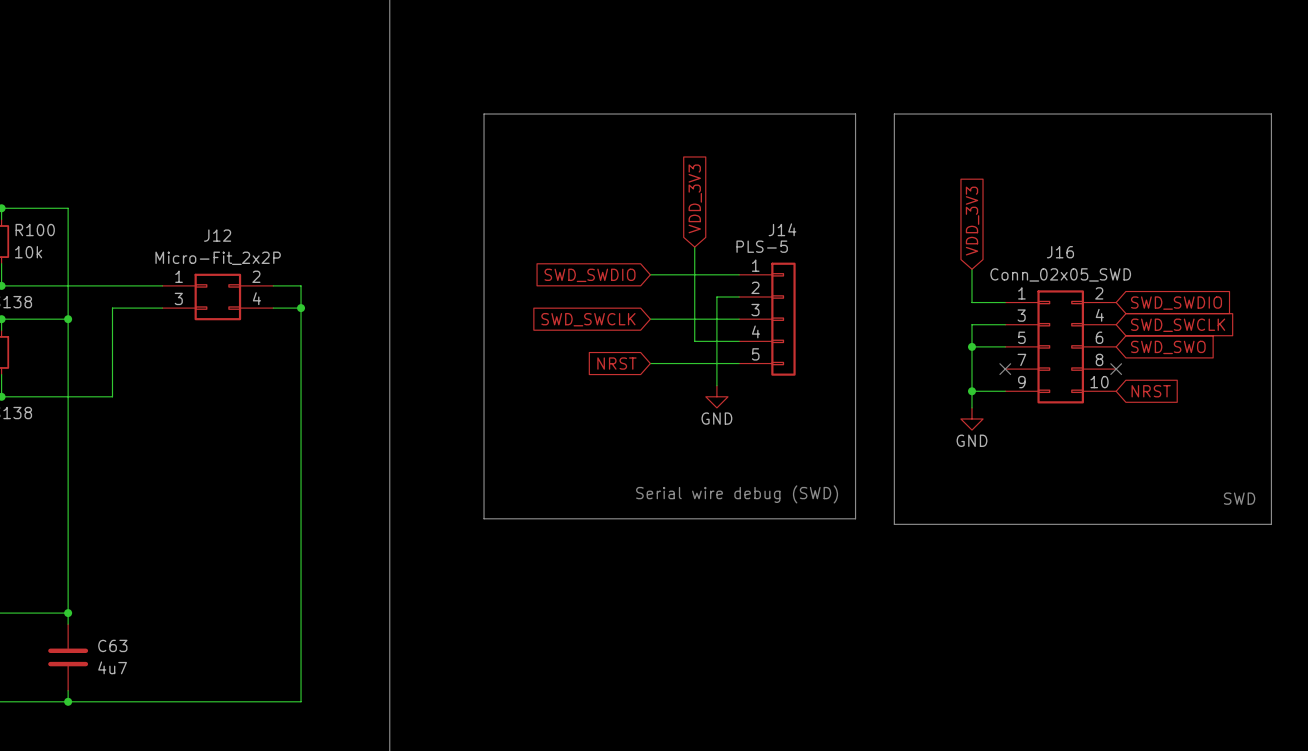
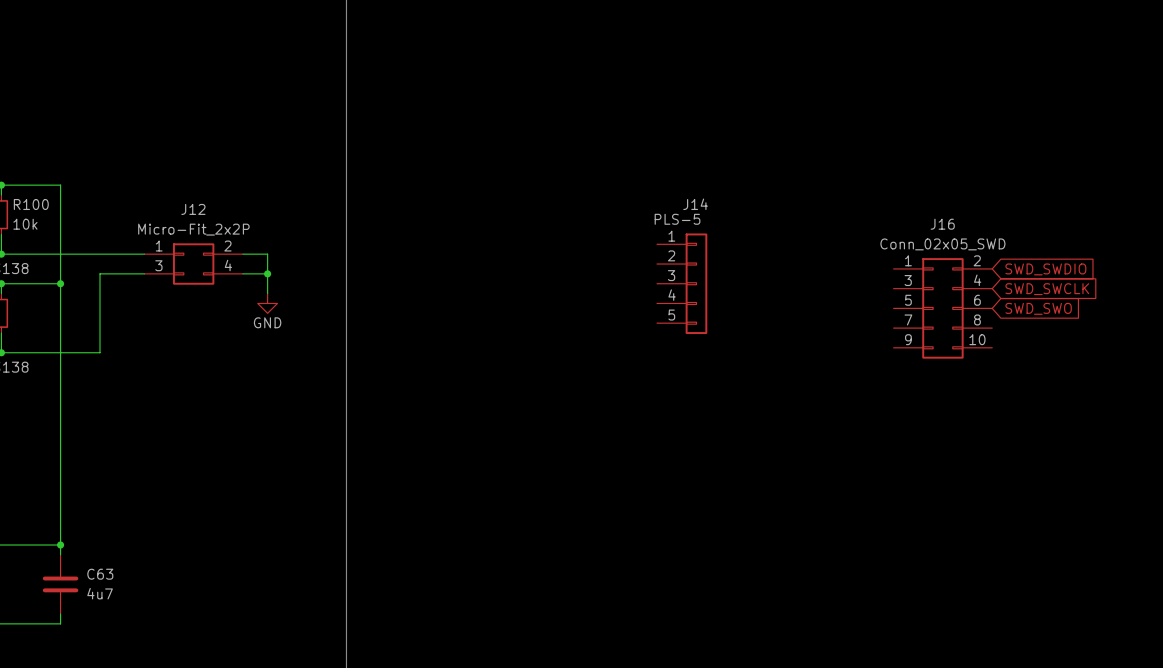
line: (484, 114) (855, 114) (855, 518) (484, 518) (484, 114) -> none
line: (894, 114) (894, 524) (1271, 524) (1271, 114) (894, 114) -> none
global label: VDD_3V3 (695, 198) -> none
global label: VDD_3V3 (972, 221) -> none
wire: (694, 247) (694, 341) (739, 341) -> none
wire: (971, 269) (971, 302) (1005, 302) -> none
wire: (650, 274) (739, 274) -> none
global label: SWD_SWDIO (590, 275) -> none
wire: (739, 297) (716, 297) (716, 385) -> none
global label: SWD_SWCLK (588, 319) -> none
wire: (650, 319) (739, 319) -> none
wire: (1005, 324) (971, 324) (971, 407) -> none
wire: (301, 330) (301, 701) (68, 701) -> none
power symbol: none -> GND (267, 303)
wire: (971, 346) (1005, 346) -> none
junction: (971, 346) -> none
global label: NRST (616, 363) -> none
wire: (650, 363) (739, 363) -> none
no-connect mark: (1005, 369) -> none
no-connect mark: (1116, 369) -> none
wire: (971, 391) (1005, 391) -> none
junction: (971, 391) -> none
global label: NRST (1151, 391) -> none
power symbol: GND (716, 396) -> none
power symbol: GND (971, 418) -> none
text: Serial wire debug (SWD) (737, 494) -> none
text: SWD (1239, 498) -> none
junction: (68, 701) -> none

